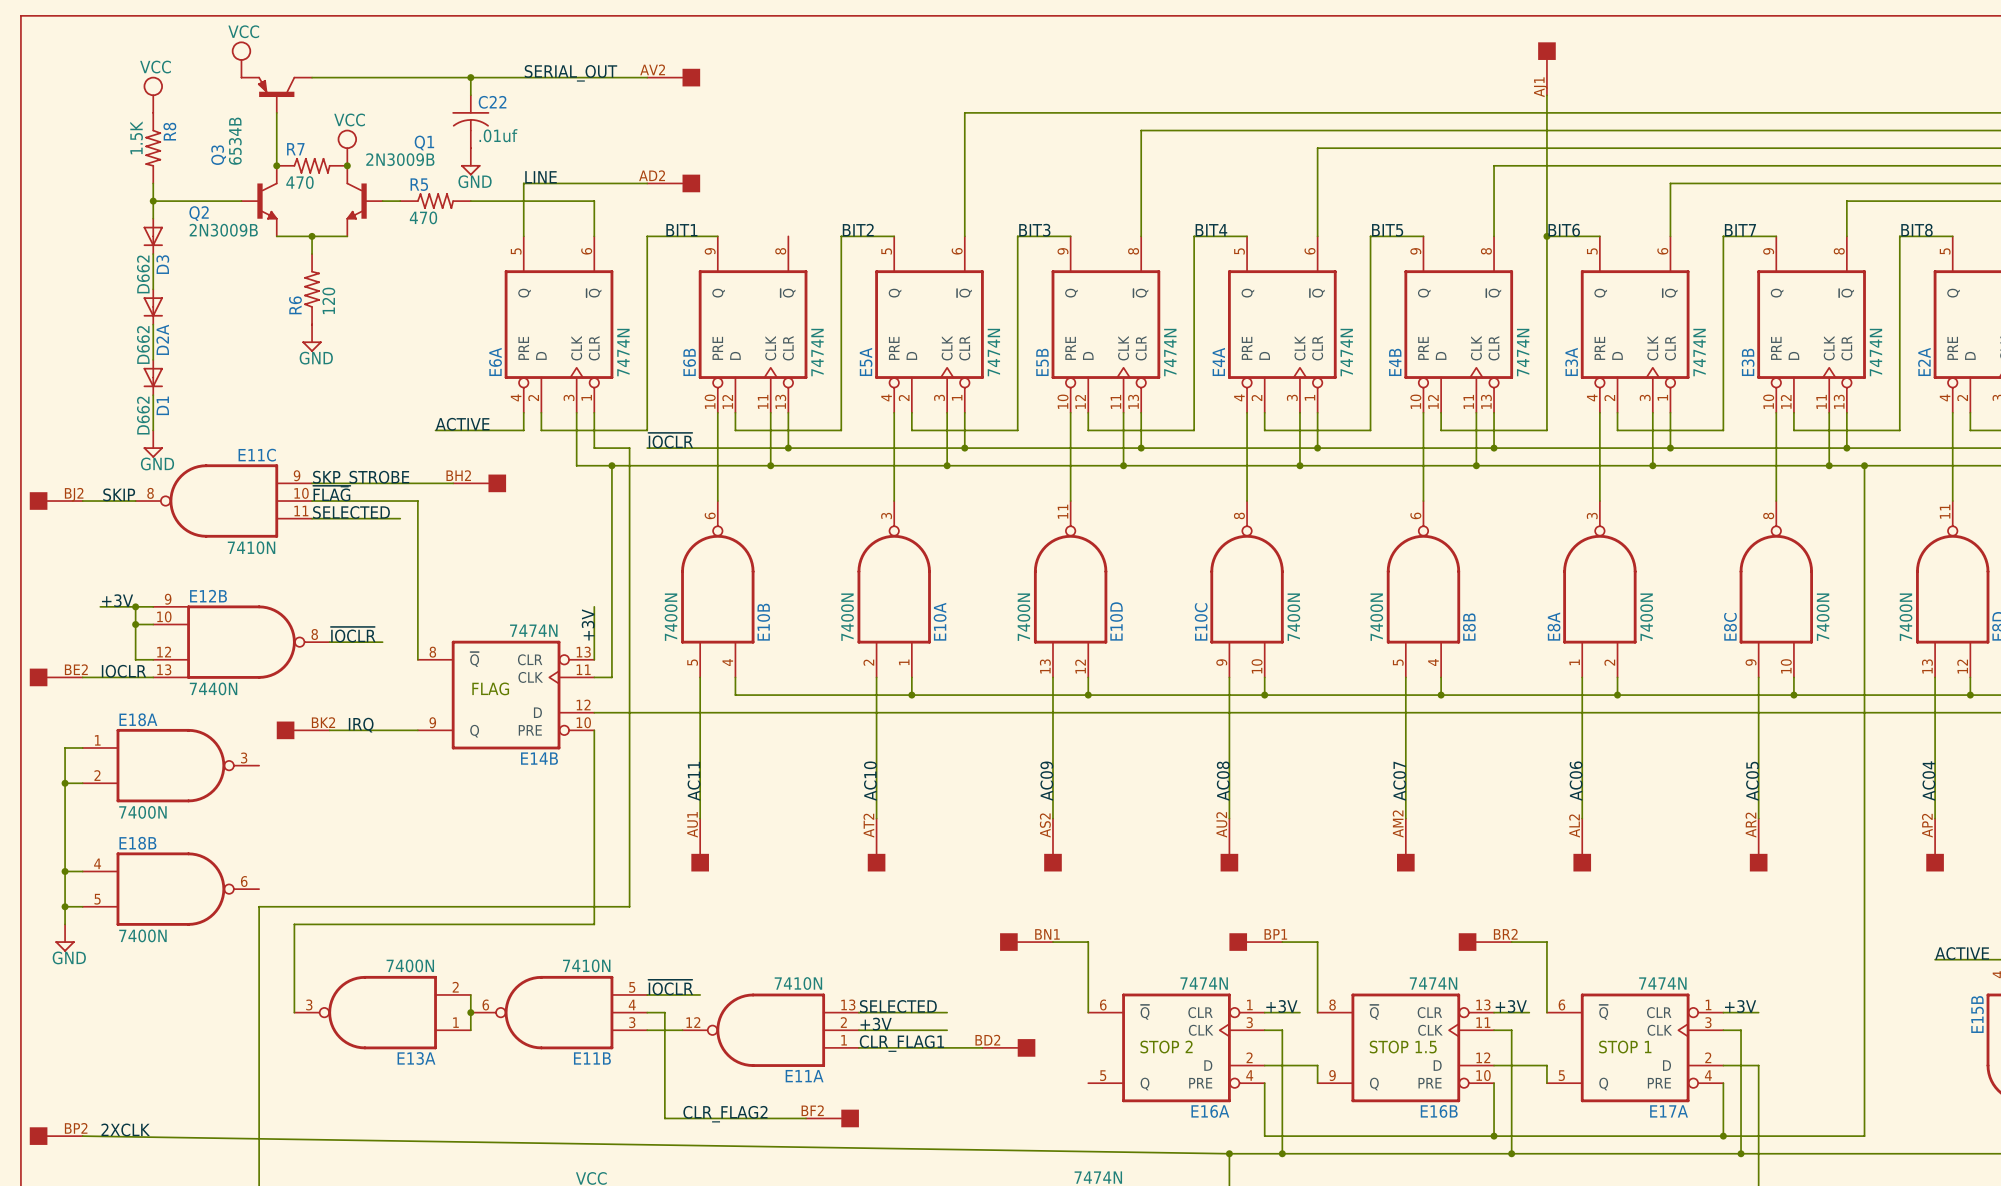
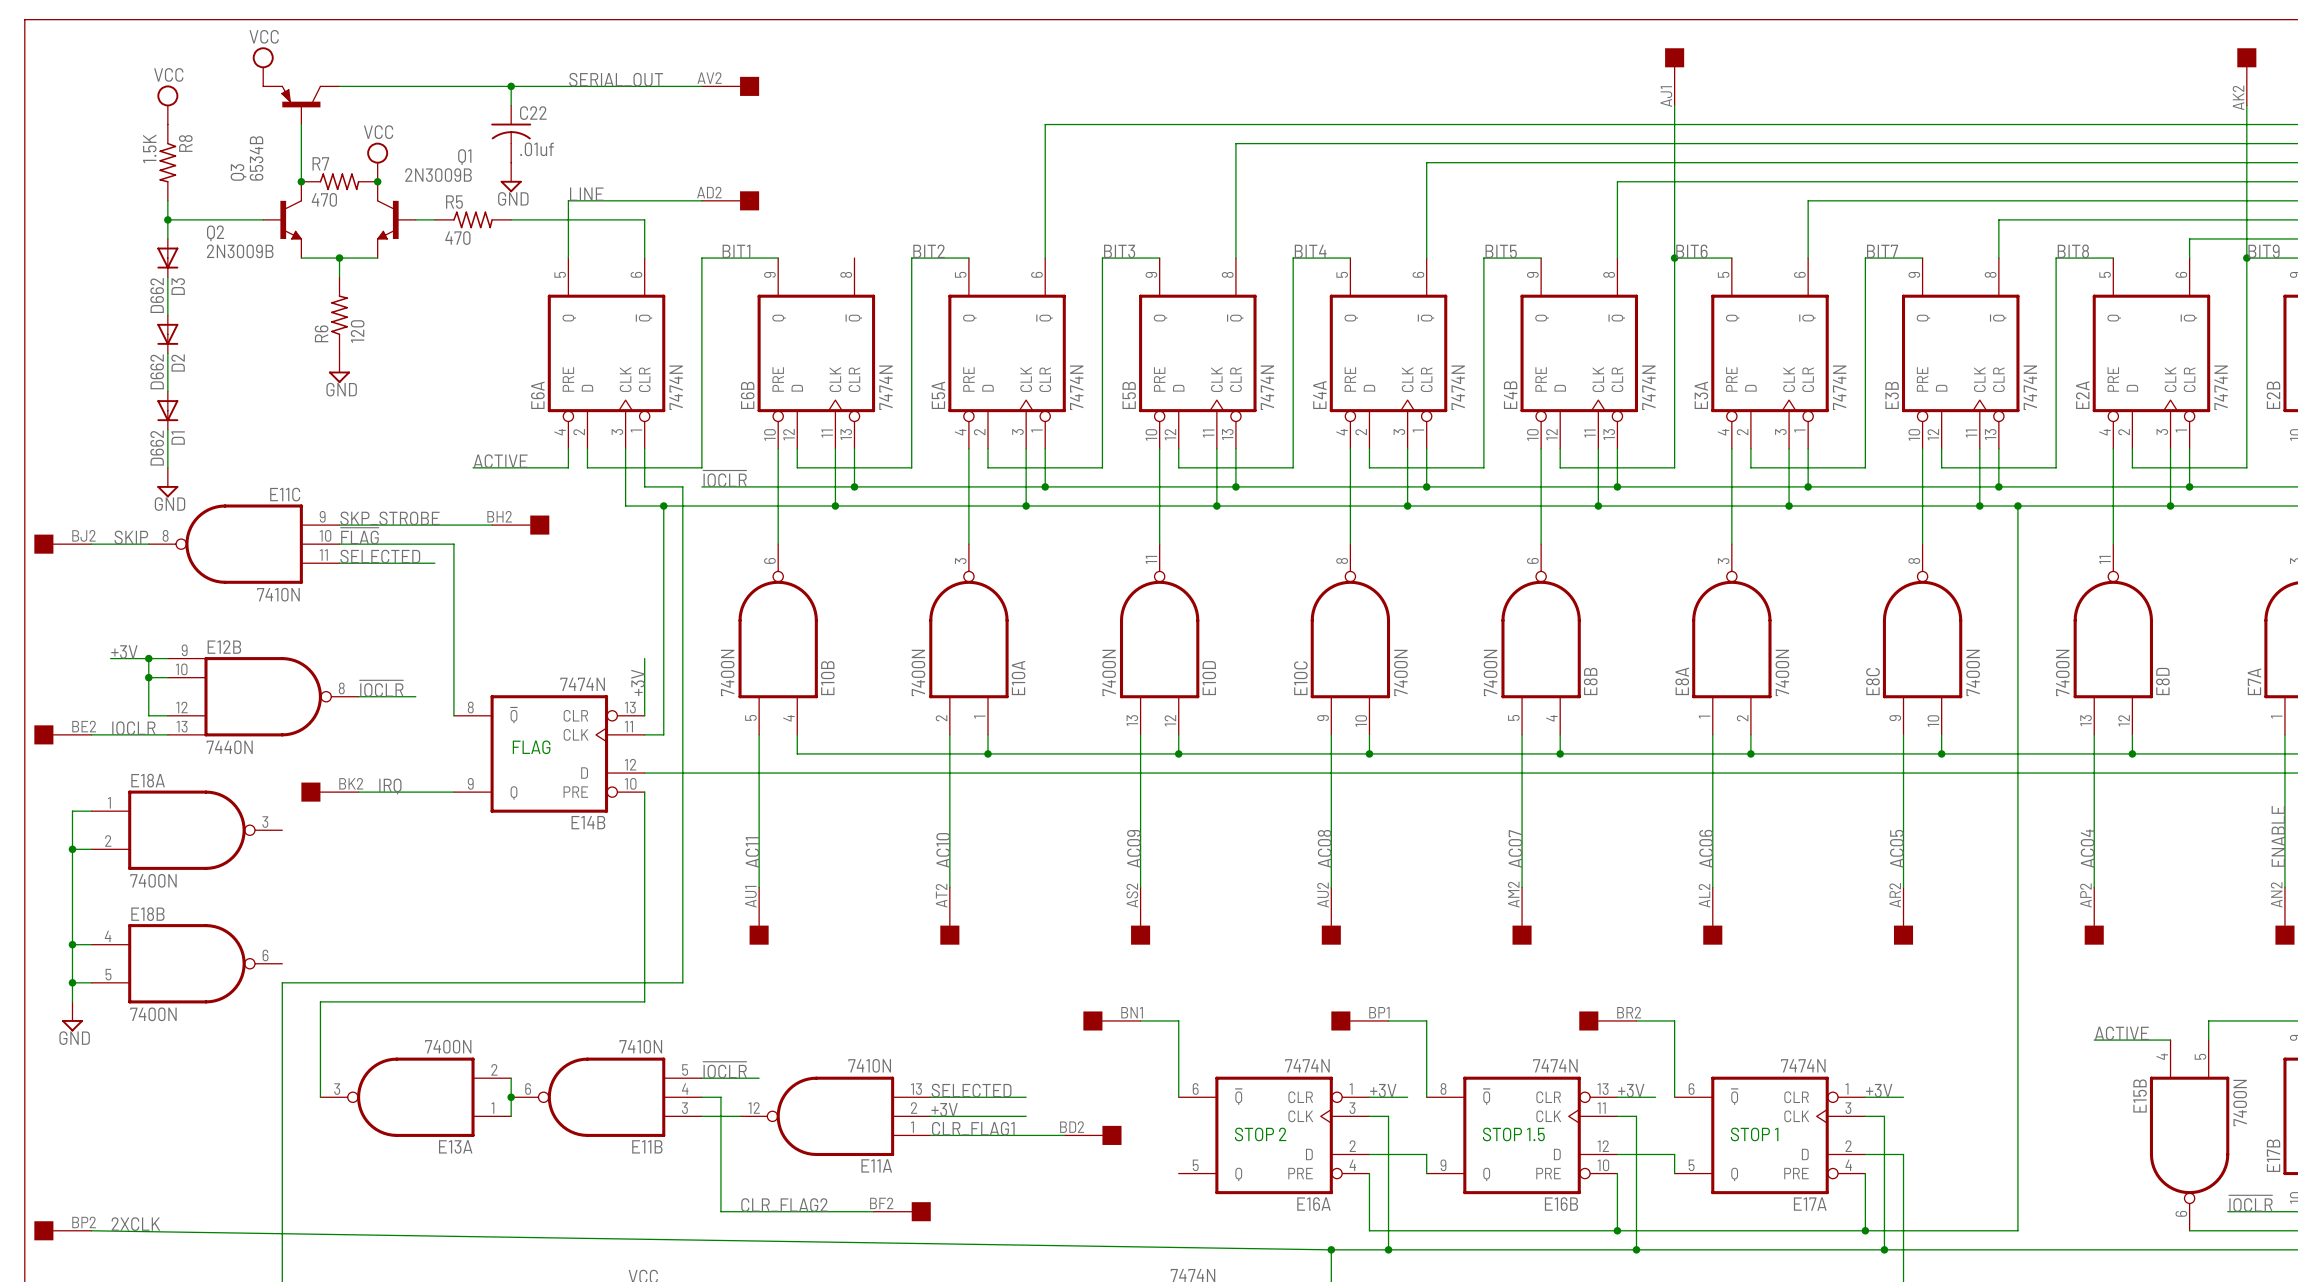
D2A name: D2A (162, 339) -> D2 (178, 363)

